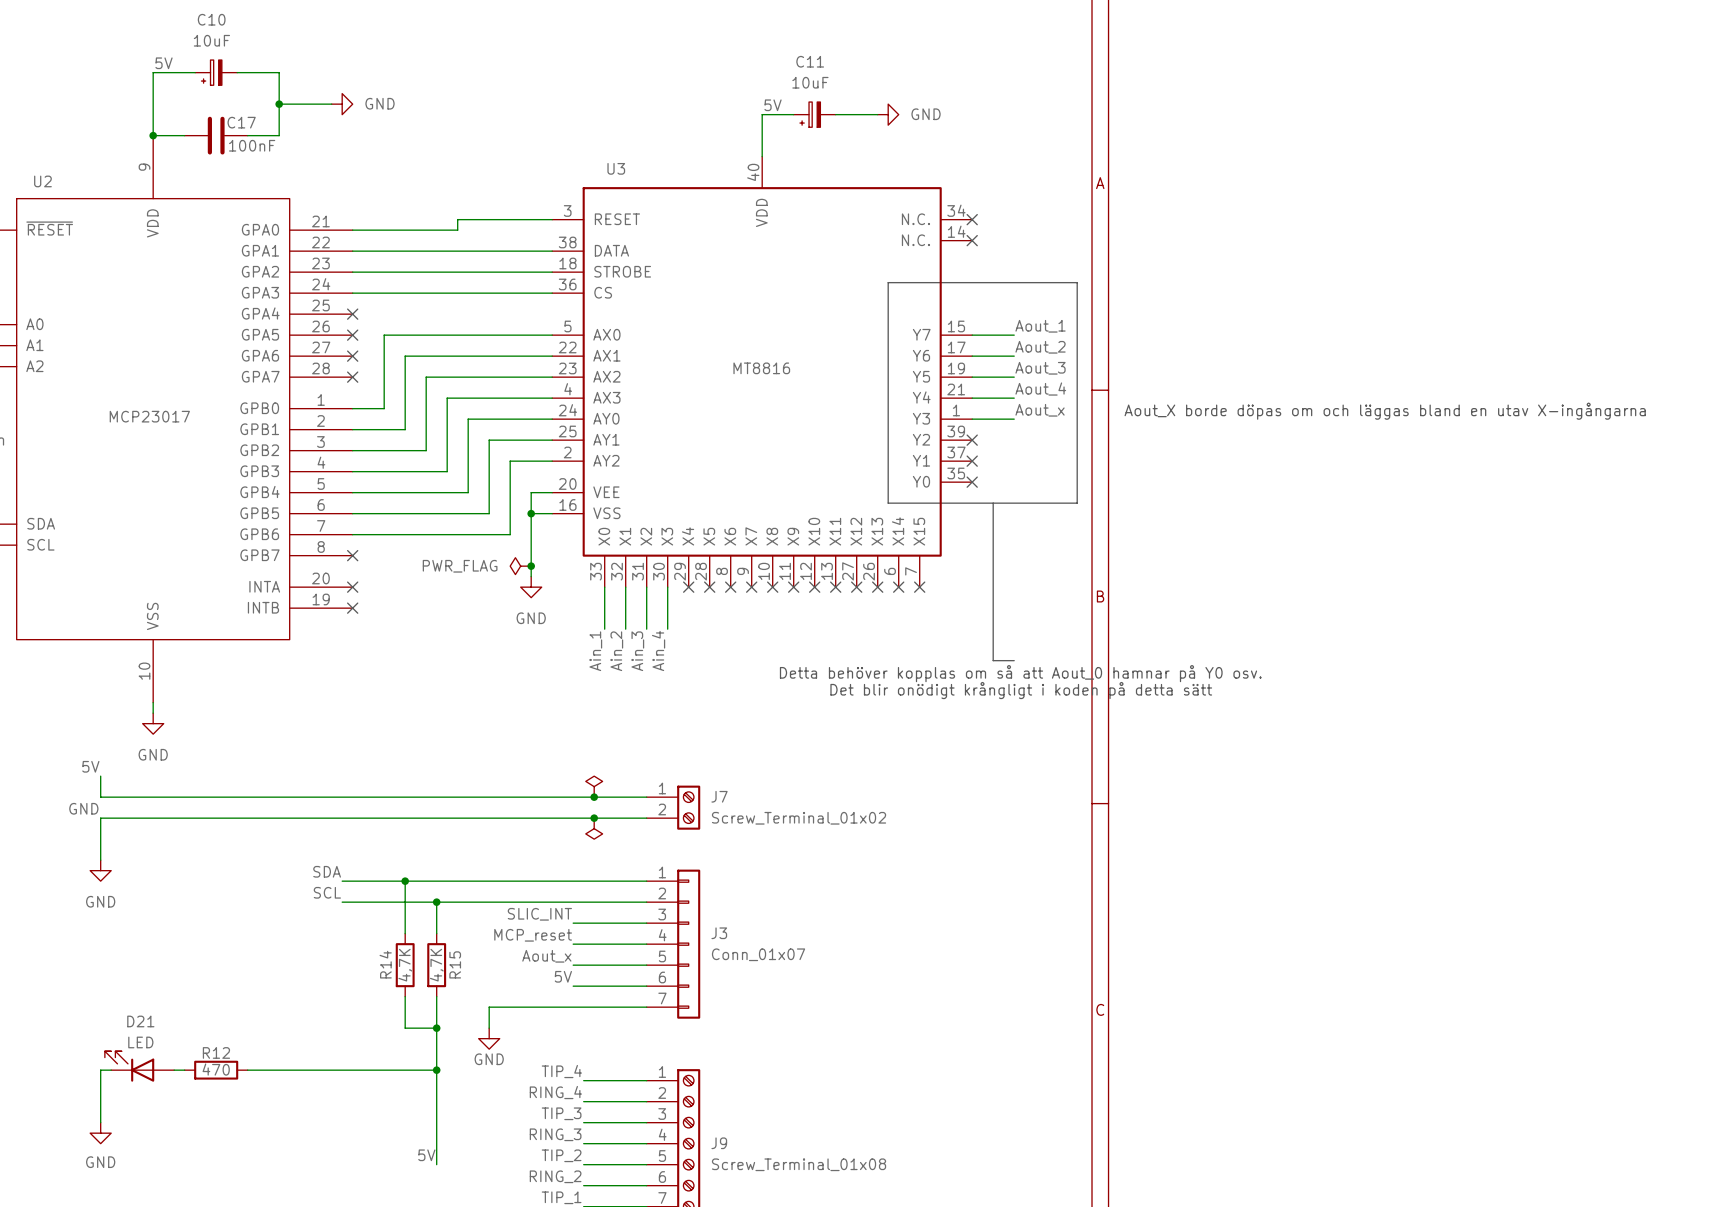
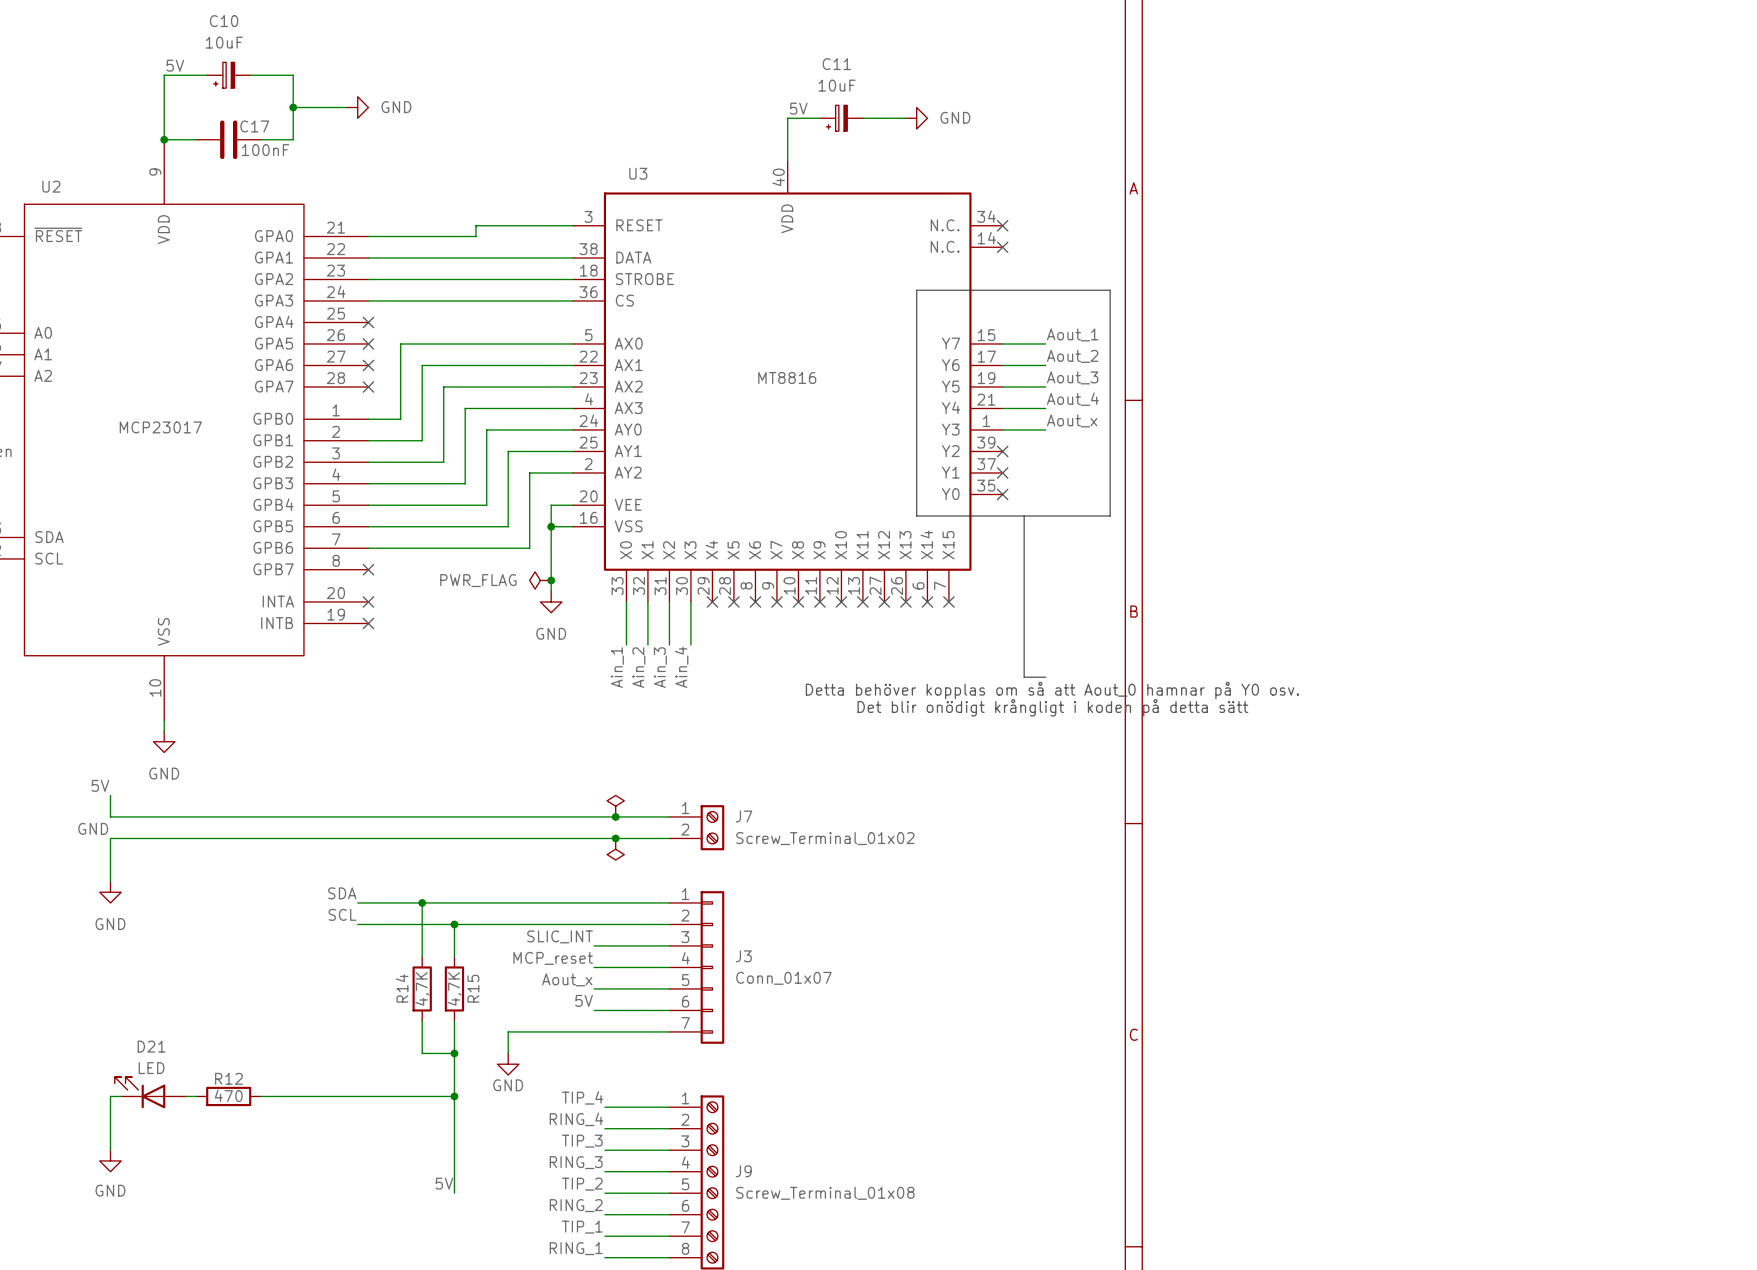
text: Aout_X borde döpas om och läggas bland en utav X-ingångarna (1385, 411) -> none

